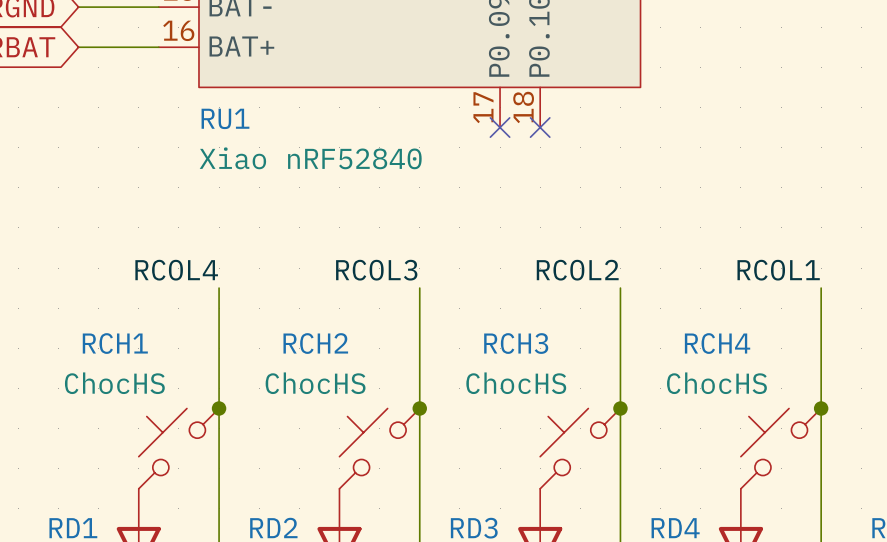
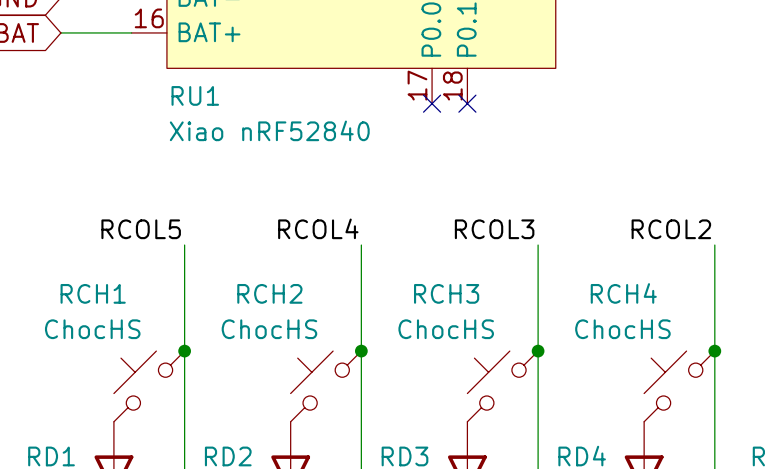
label: RCOL4 (176, 270) -> RCOL5 (141, 229)
label: RCOL3 (376, 270) -> RCOL4 (318, 228)
label: RCOL2 (577, 270) -> RCOL3 (494, 229)
label: RCOL1 (778, 270) -> RCOL2 (671, 229)

